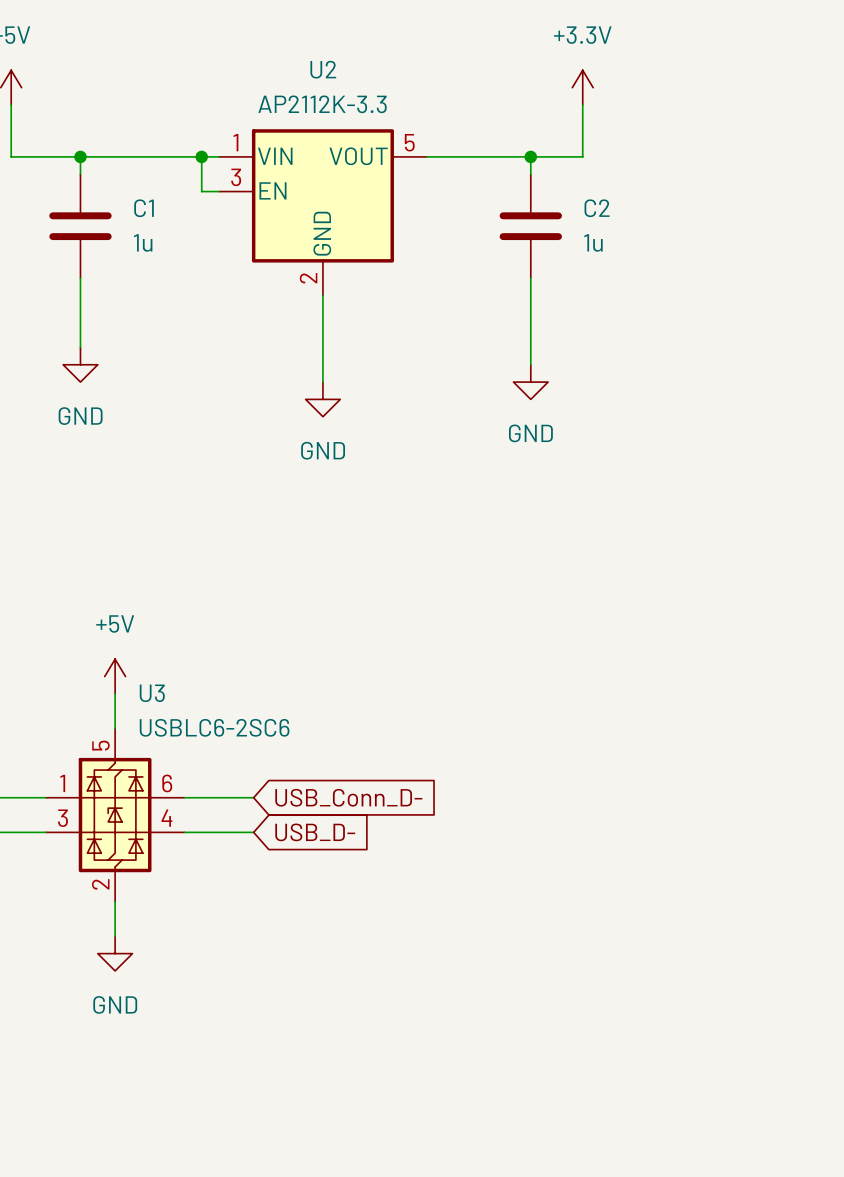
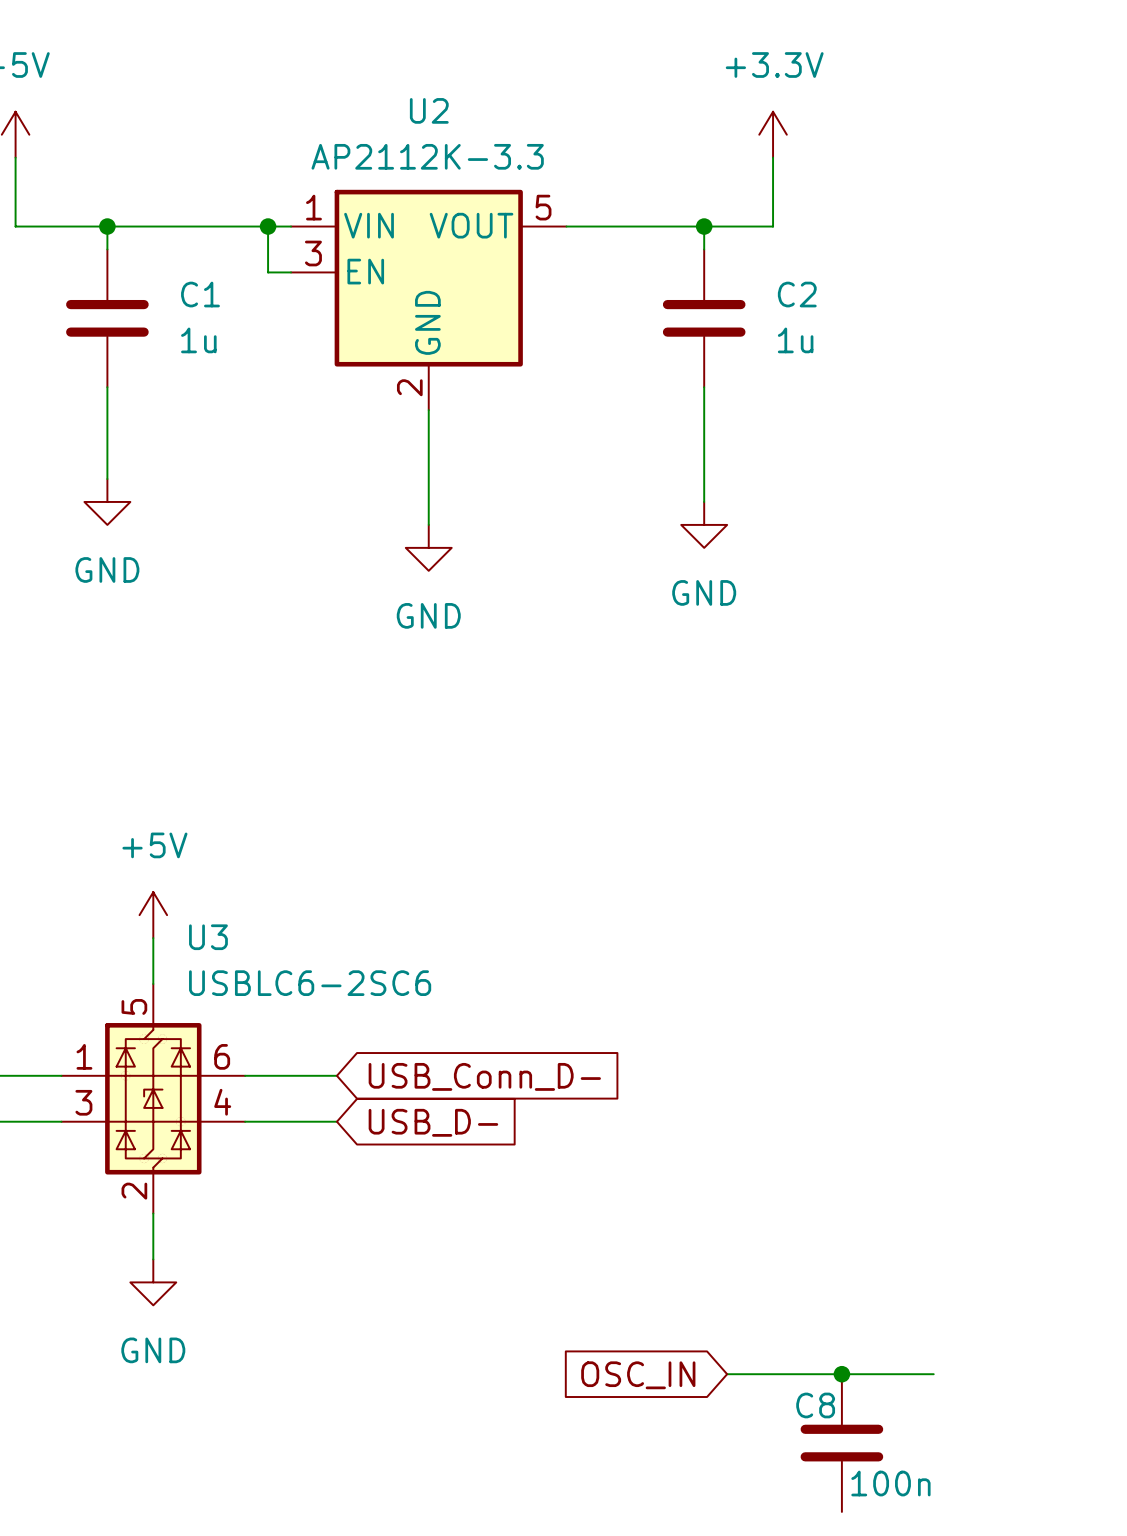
global label: none -> OSC_IN (638, 1375)
wire: none -> (727, 1374) (933, 1374)
junction: none -> (841, 1374)
C8: none -> 100n (841, 1443)

